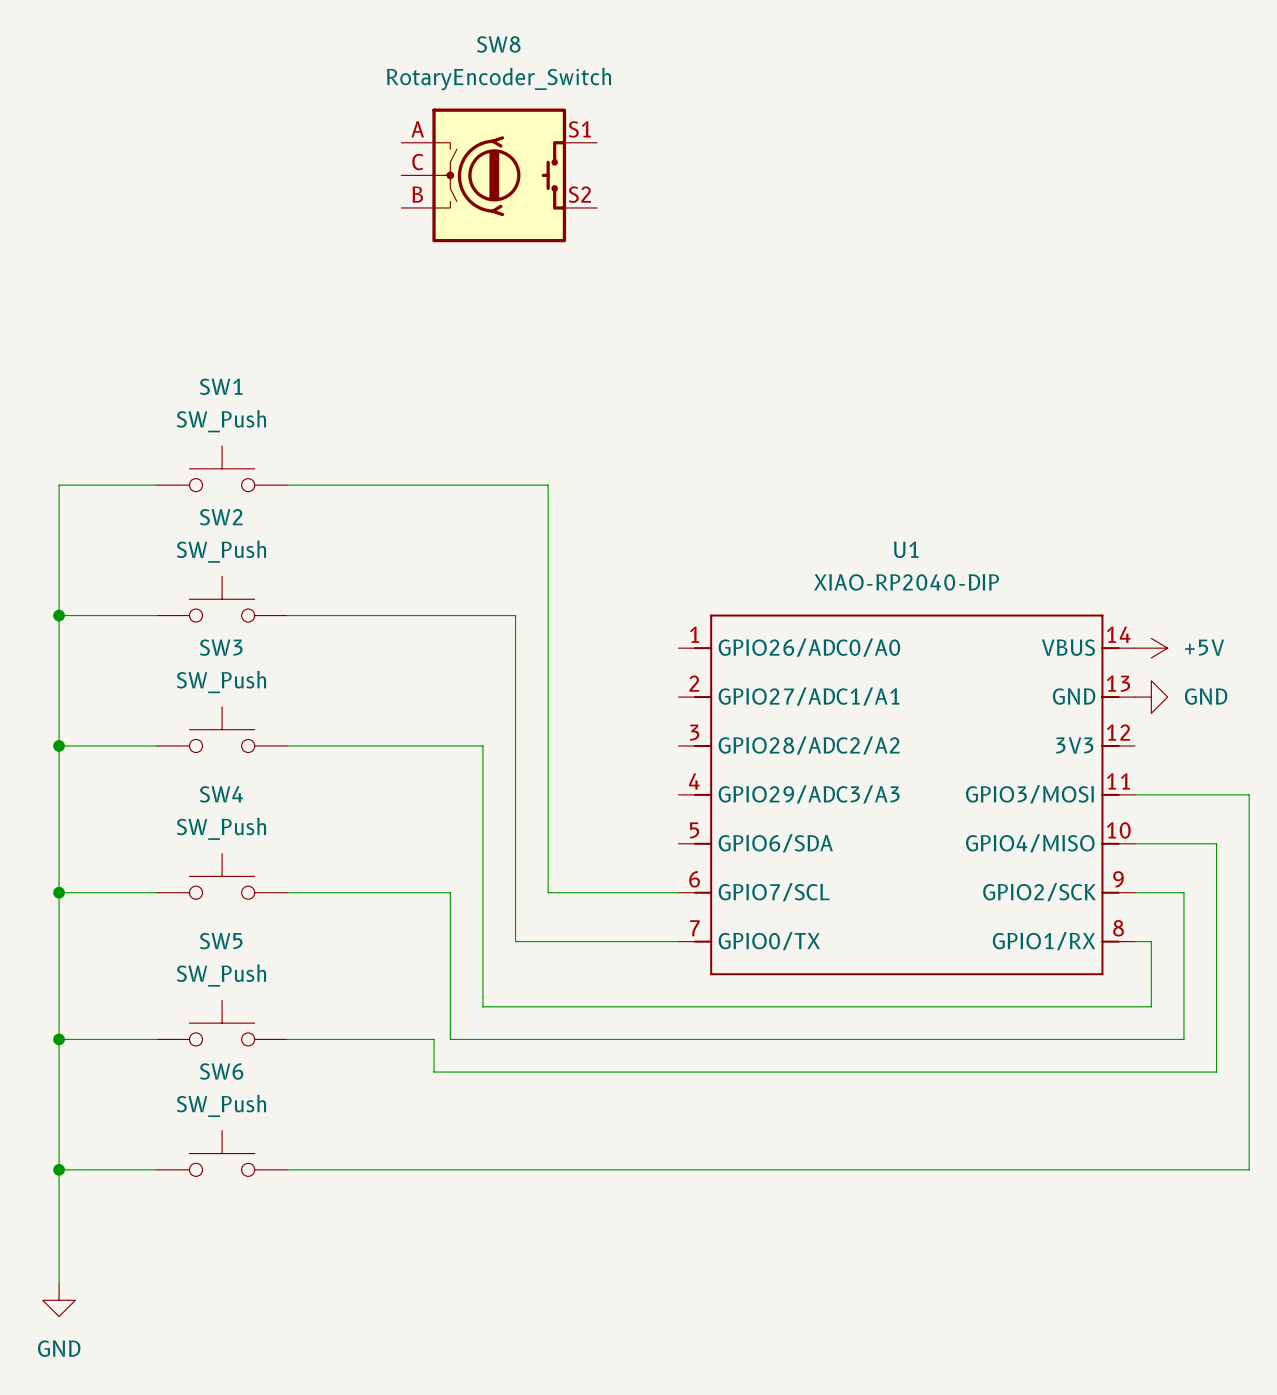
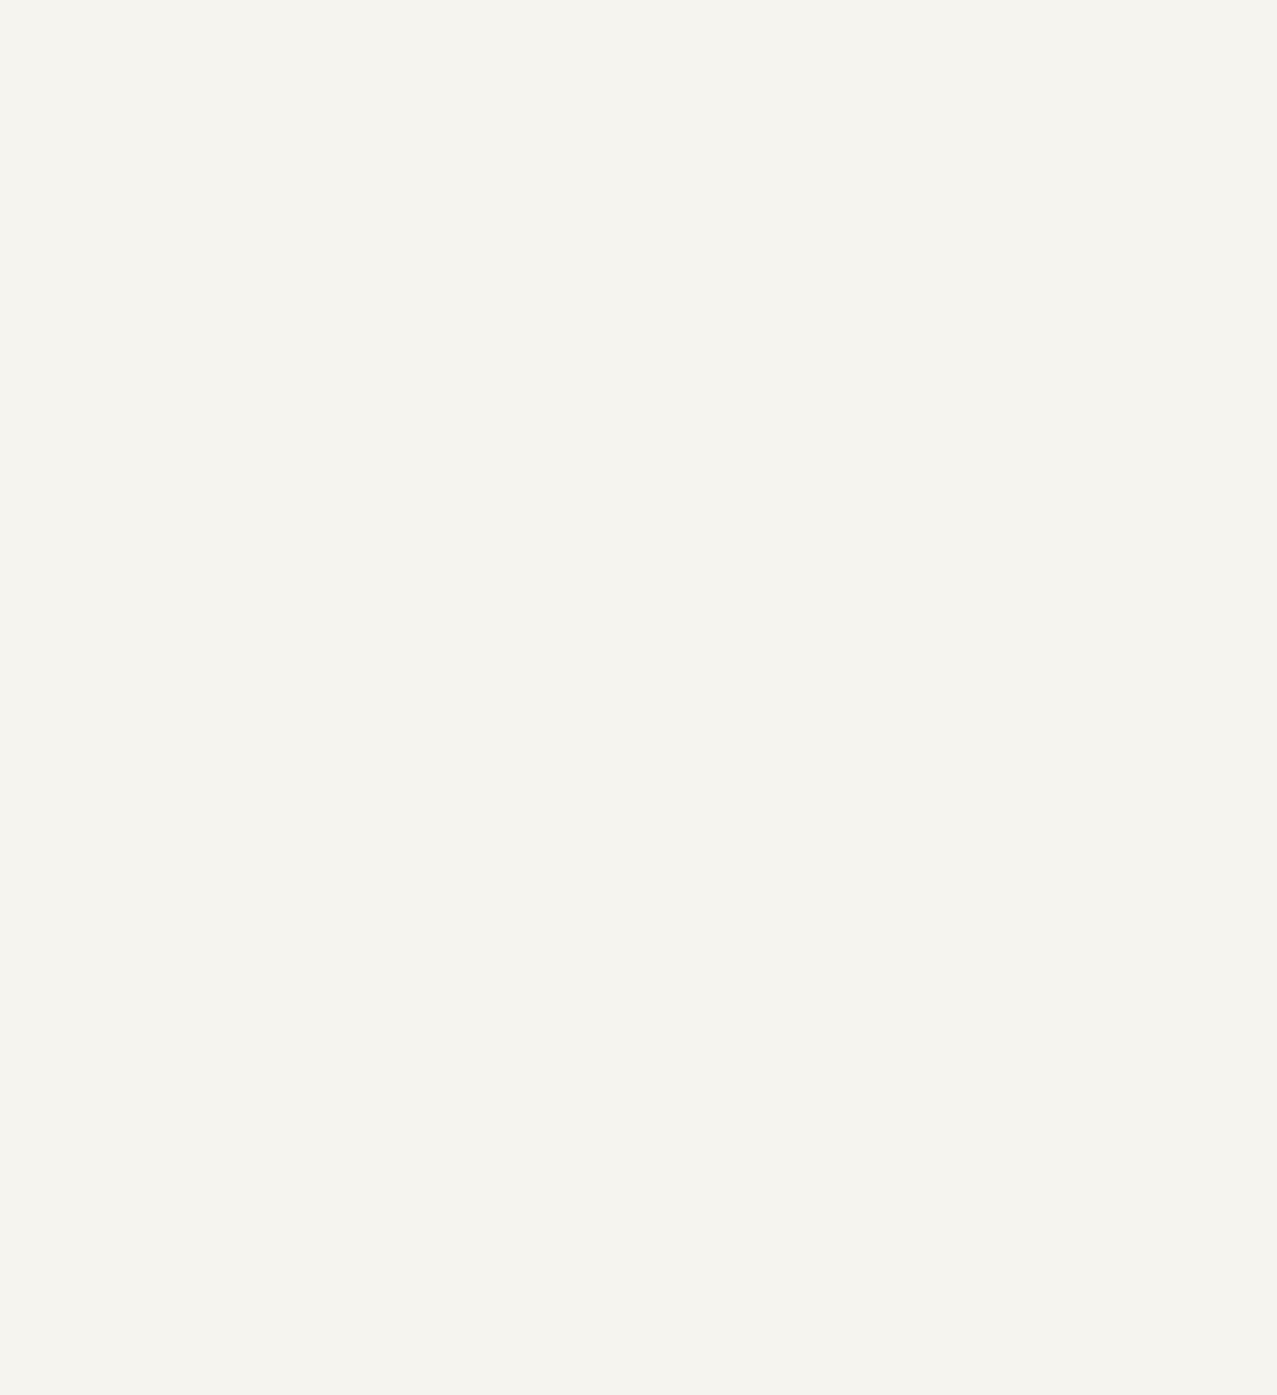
SW8: RotaryEncoder_Switch (499, 175) -> none
SW1: SW_Push (222, 468) -> none
wire: (156, 485) (59, 485) (59, 1283) -> none
wire: (287, 485) (548, 485) (548, 892) (678, 892) -> none
SW2: SW_Push (222, 599) -> none
wire: (59, 615) (156, 615) -> none
junction: (59, 615) -> none
wire: (287, 615) (515, 615) (515, 941) (678, 941) -> none
power symbol: +5V (1151, 648) -> none
power symbol: GND (1151, 697) -> none
SW3: SW_Push (222, 729) -> none
wire: (59, 745) (156, 745) -> none
junction: (59, 745) -> none
wire: (287, 745) (482, 745) (482, 1006) (1151, 1006) (1151, 941) (1135, 941) -> none
U1: XIAO-RP2040-DIP (906, 794) -> none
wire: (1135, 794) (1249, 794) (1249, 1169) (287, 1169) -> none
wire: (1135, 843) (1216, 843) (1216, 1072) (434, 1072) (434, 1039) (287, 1039) -> none
SW4: SW_Push (222, 876) -> none
wire: (59, 892) (156, 892) -> none
junction: (59, 892) -> none
wire: (287, 892) (450, 892) (450, 1039) (1183, 1039) (1183, 892) (1135, 892) -> none
SW5: SW_Push (222, 1023) -> none
wire: (59, 1039) (156, 1039) -> none
junction: (59, 1039) -> none
SW6: SW_Push (222, 1153) -> none
wire: (59, 1169) (156, 1169) -> none
junction: (59, 1169) -> none
power symbol: GND (59, 1300) -> none

